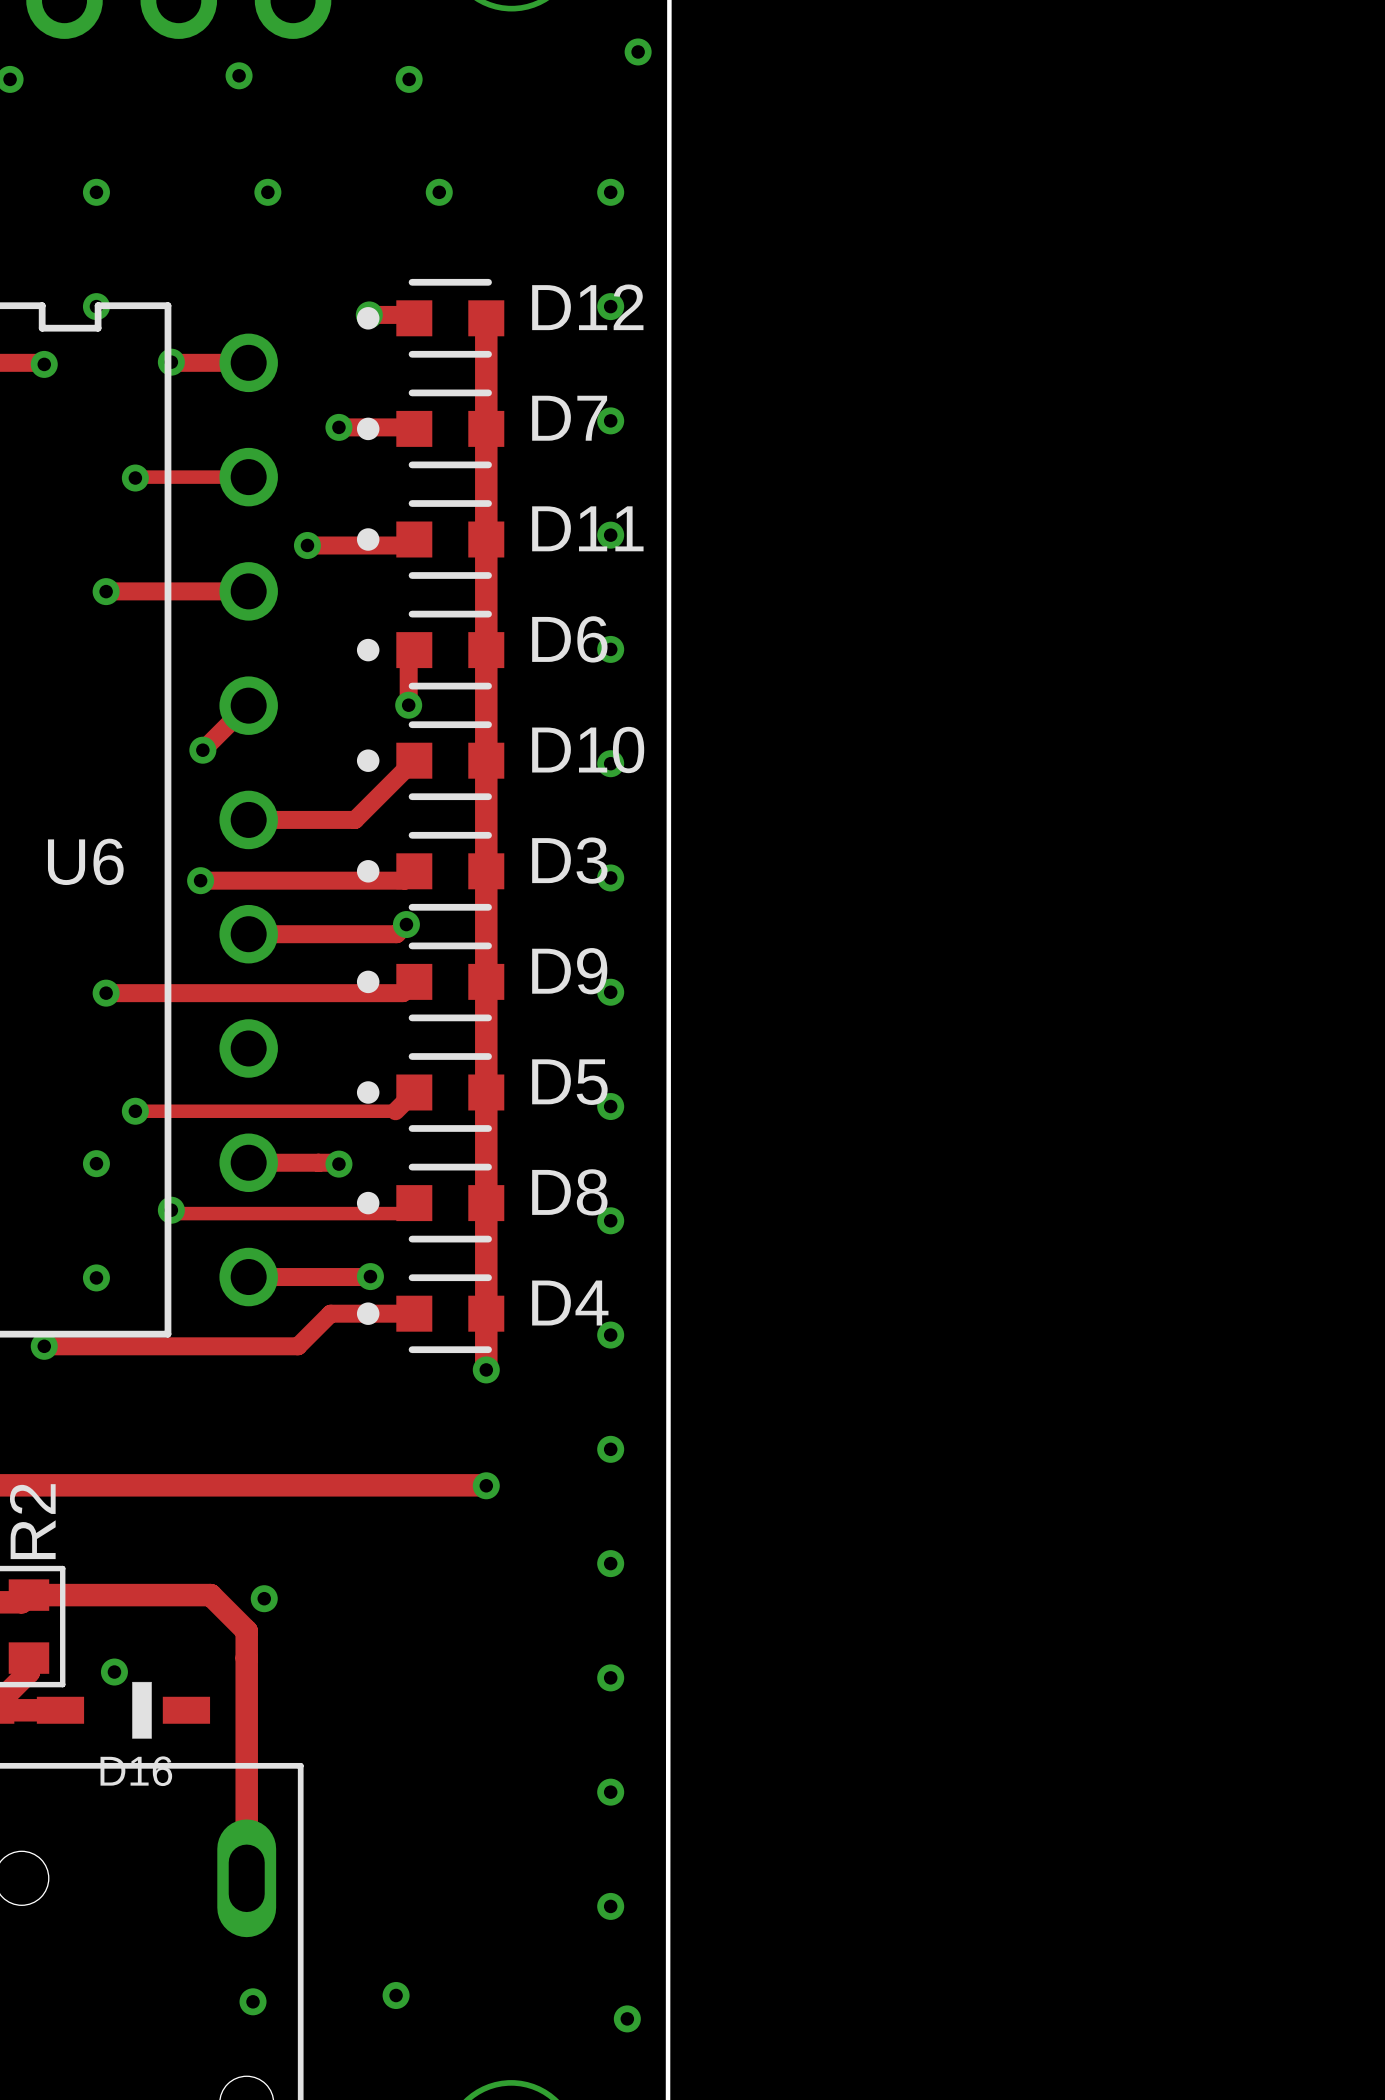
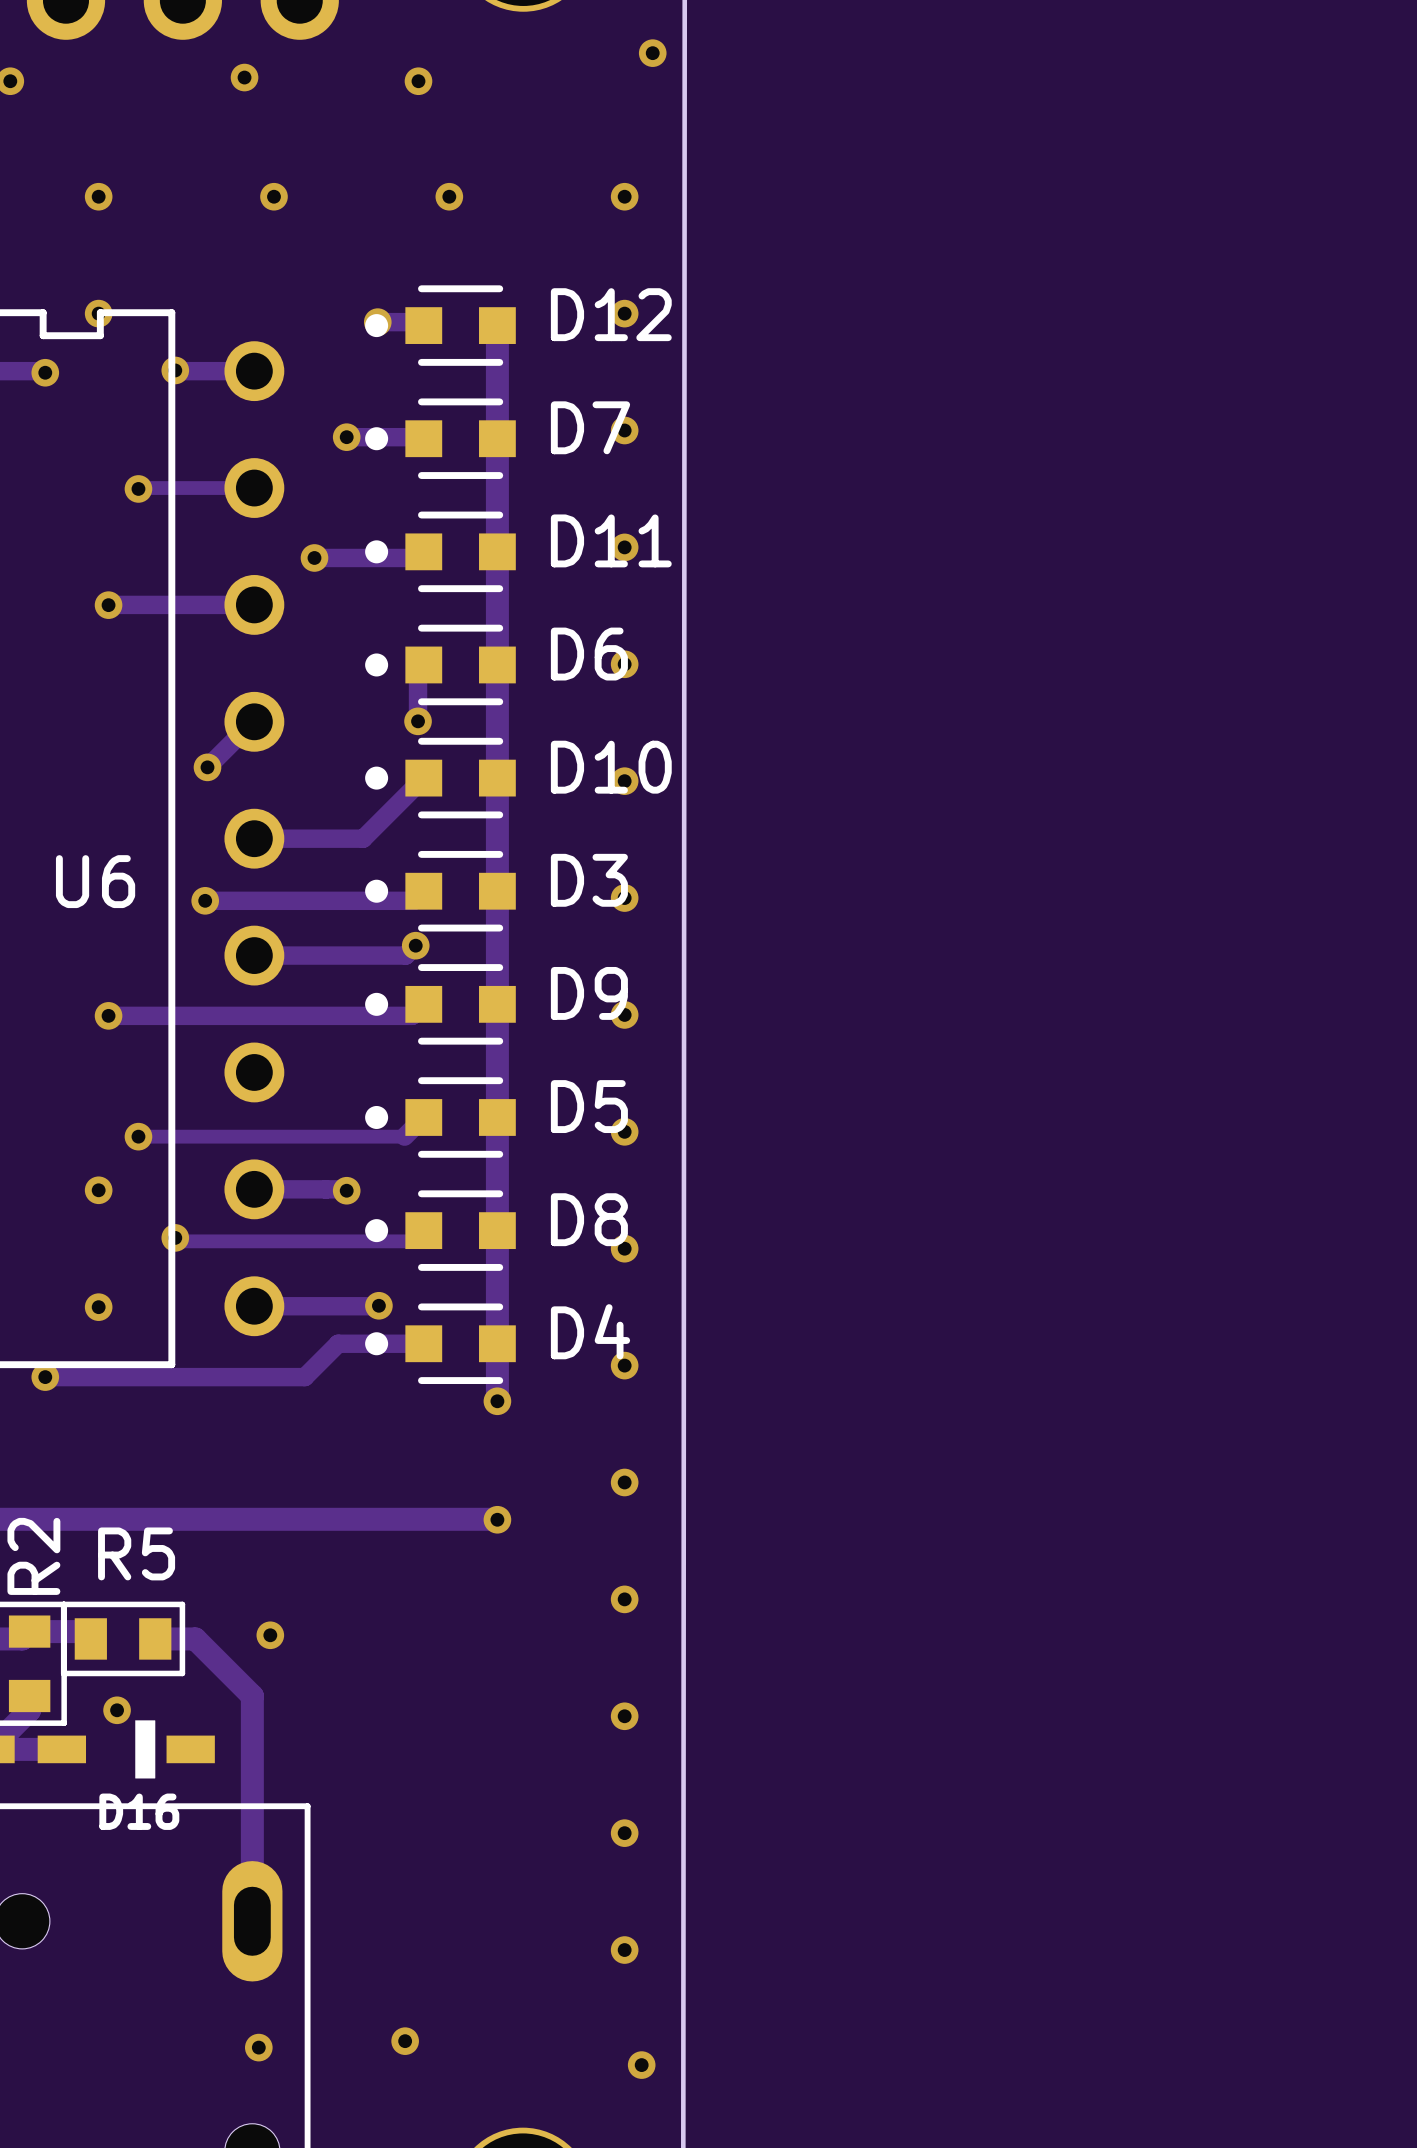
track: (81, 1595) (210, 1595) (246, 1631) (246, 1658) -> (155, 1638) (195, 1638) (252, 1696)
R5: none -> (123, 1638)

